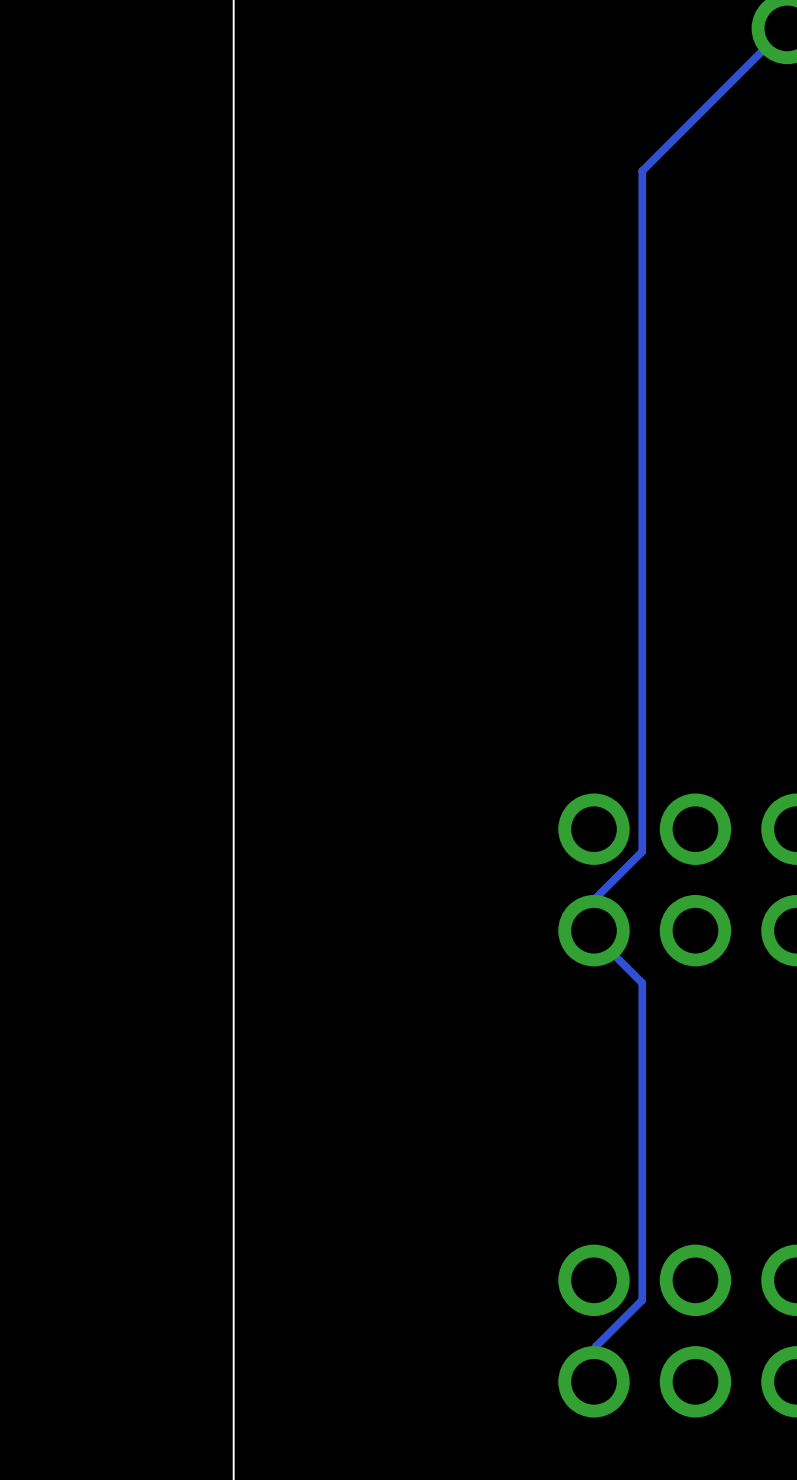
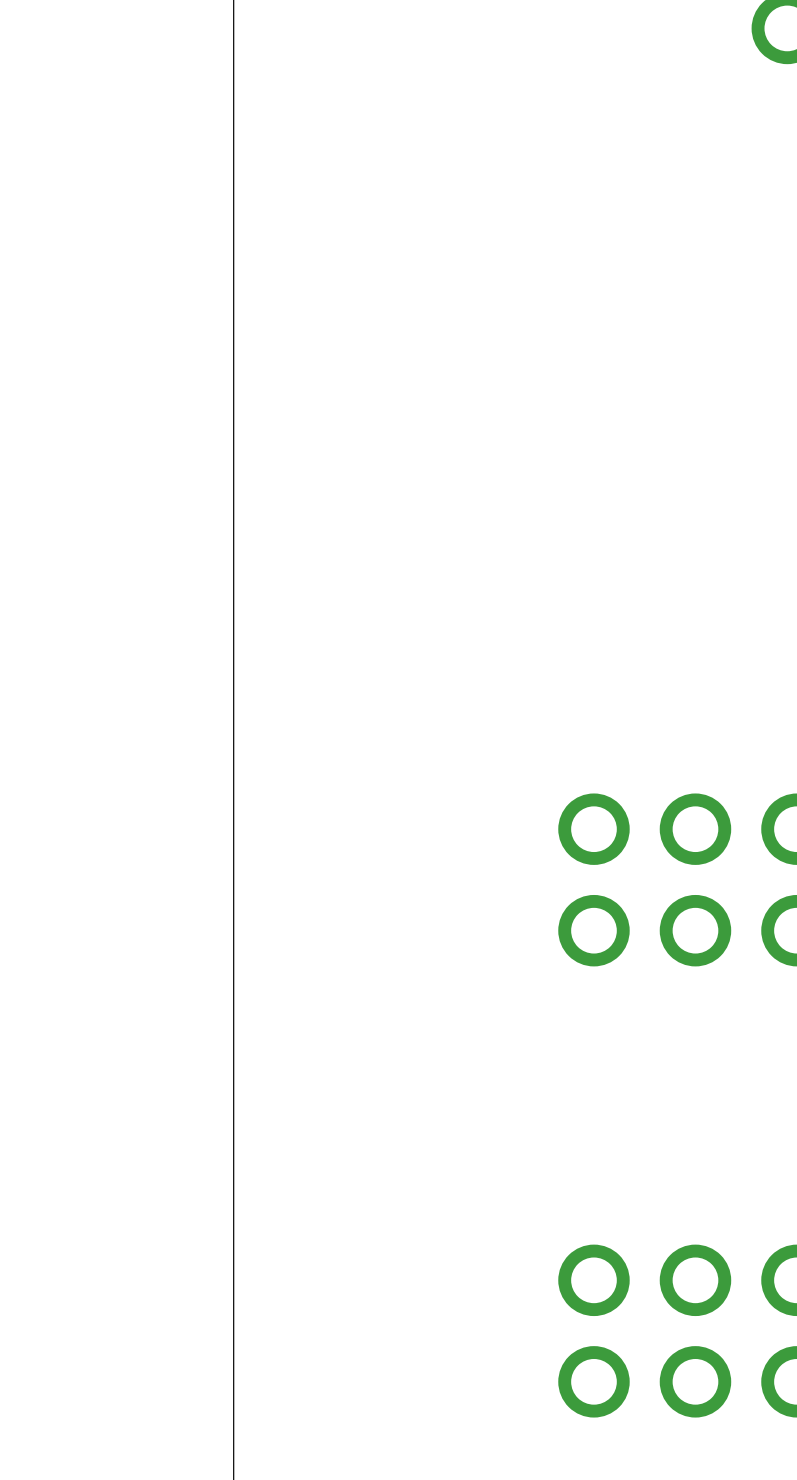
track: (787, 28) (781, 31) (642, 171) (642, 851) (595, 897) (595, 928) (593, 930) (595, 936) (642, 983) (642, 1300) (595, 1346) (595, 1377) (593, 1381) -> none

